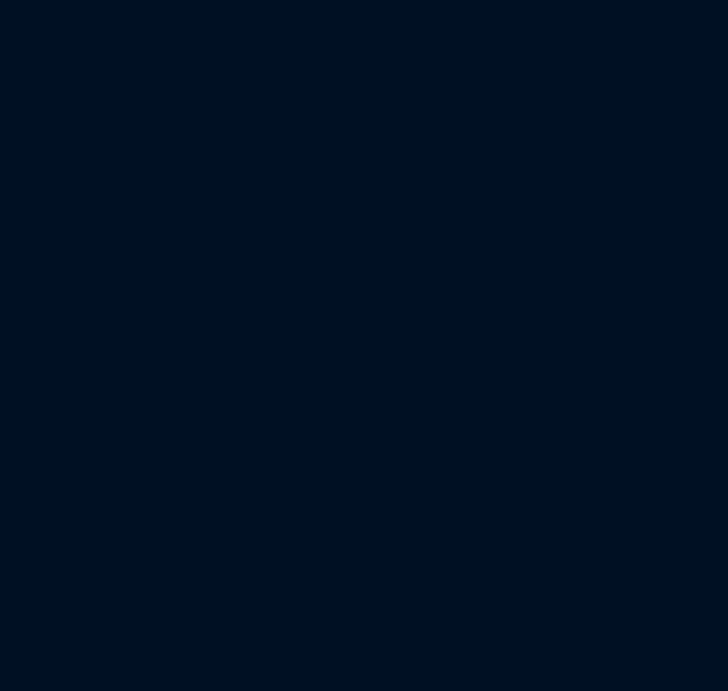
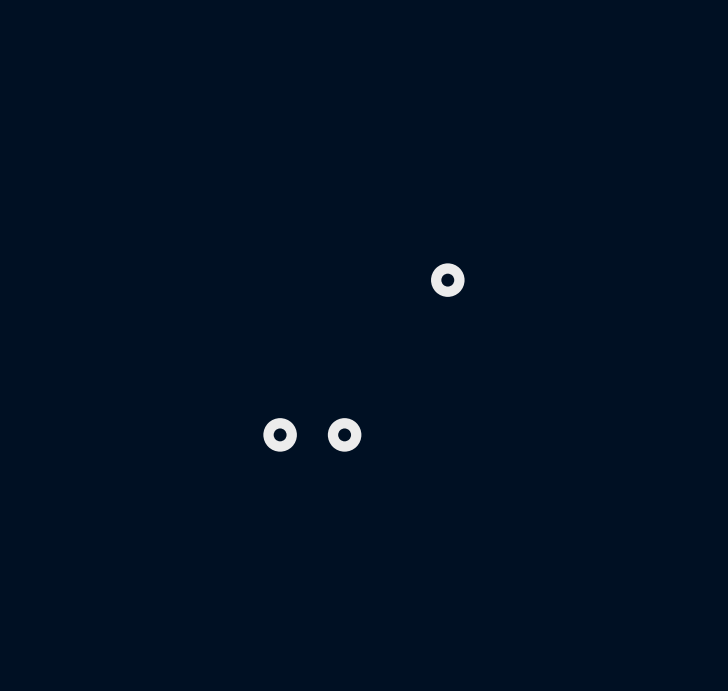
via: none -> (447, 280)
via: none -> (280, 434)
via: none -> (344, 434)

